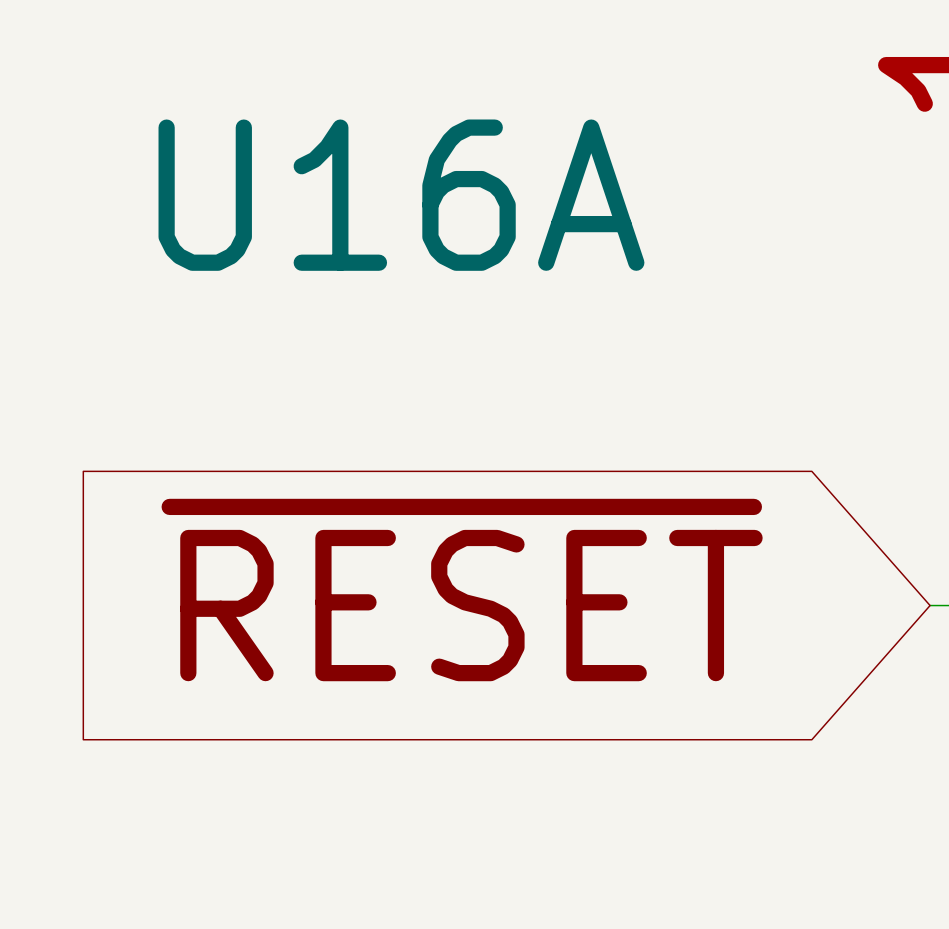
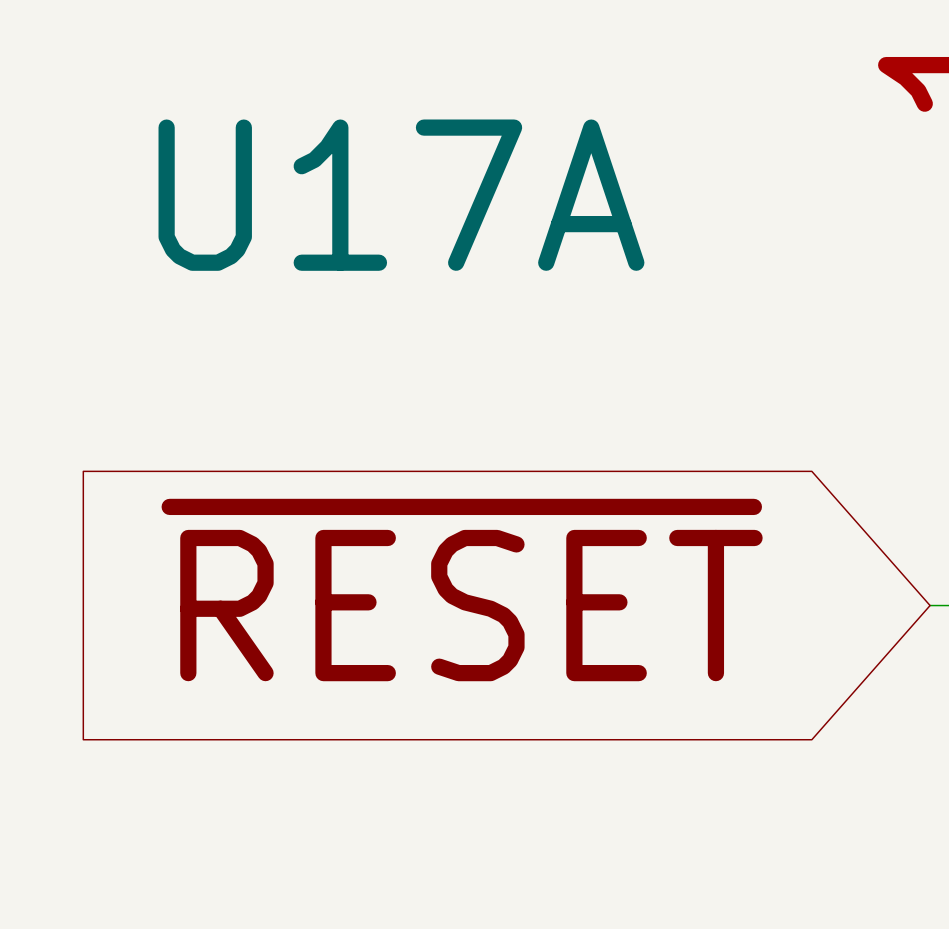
U16A name: U16A (401, 195) -> U17A (401, 195)

